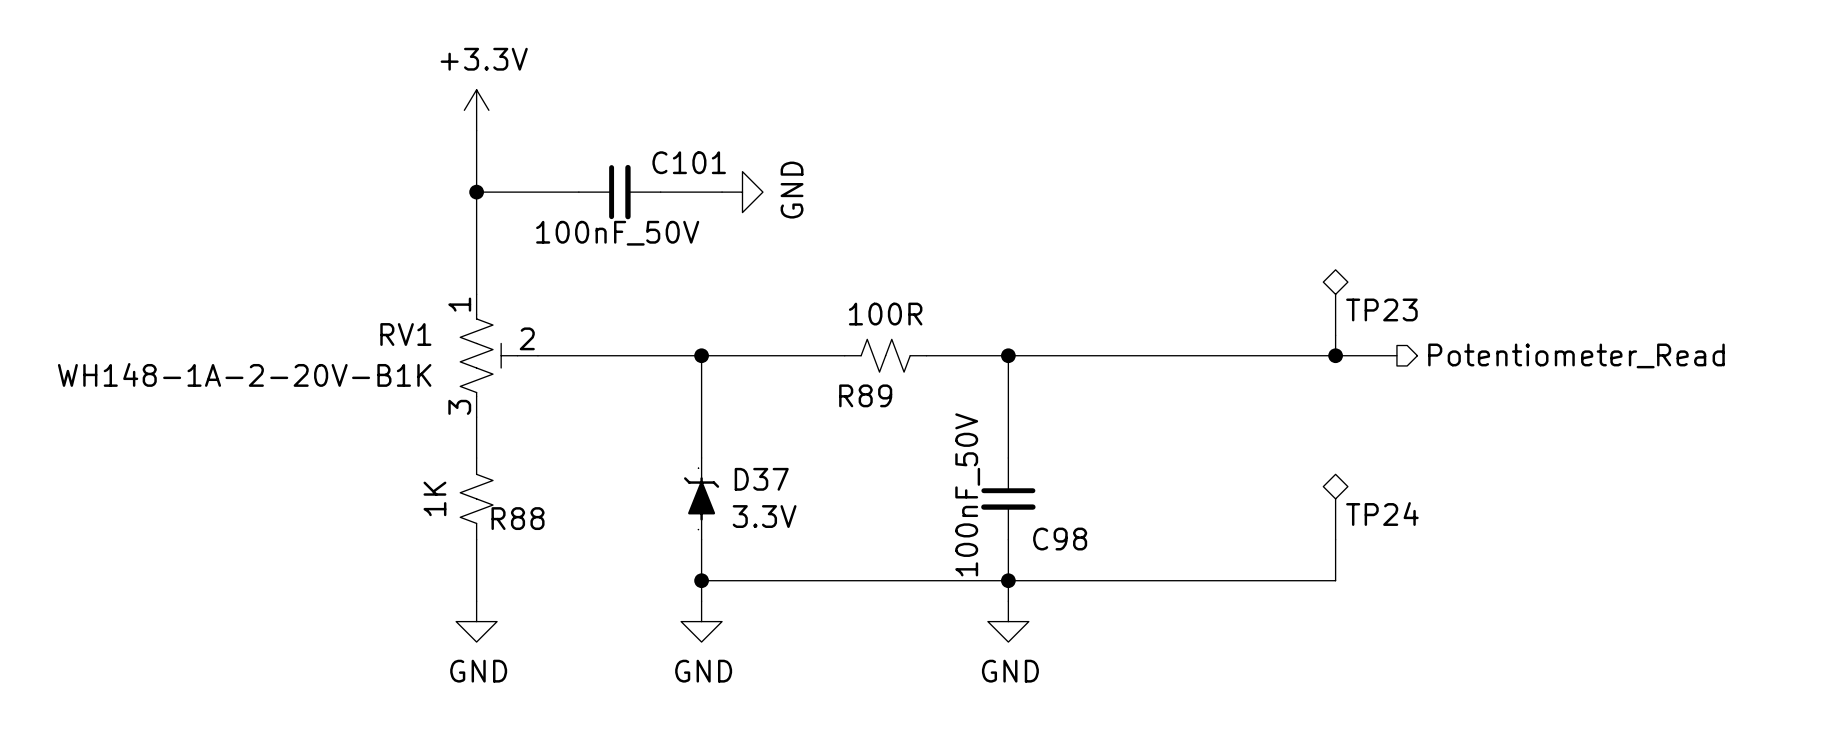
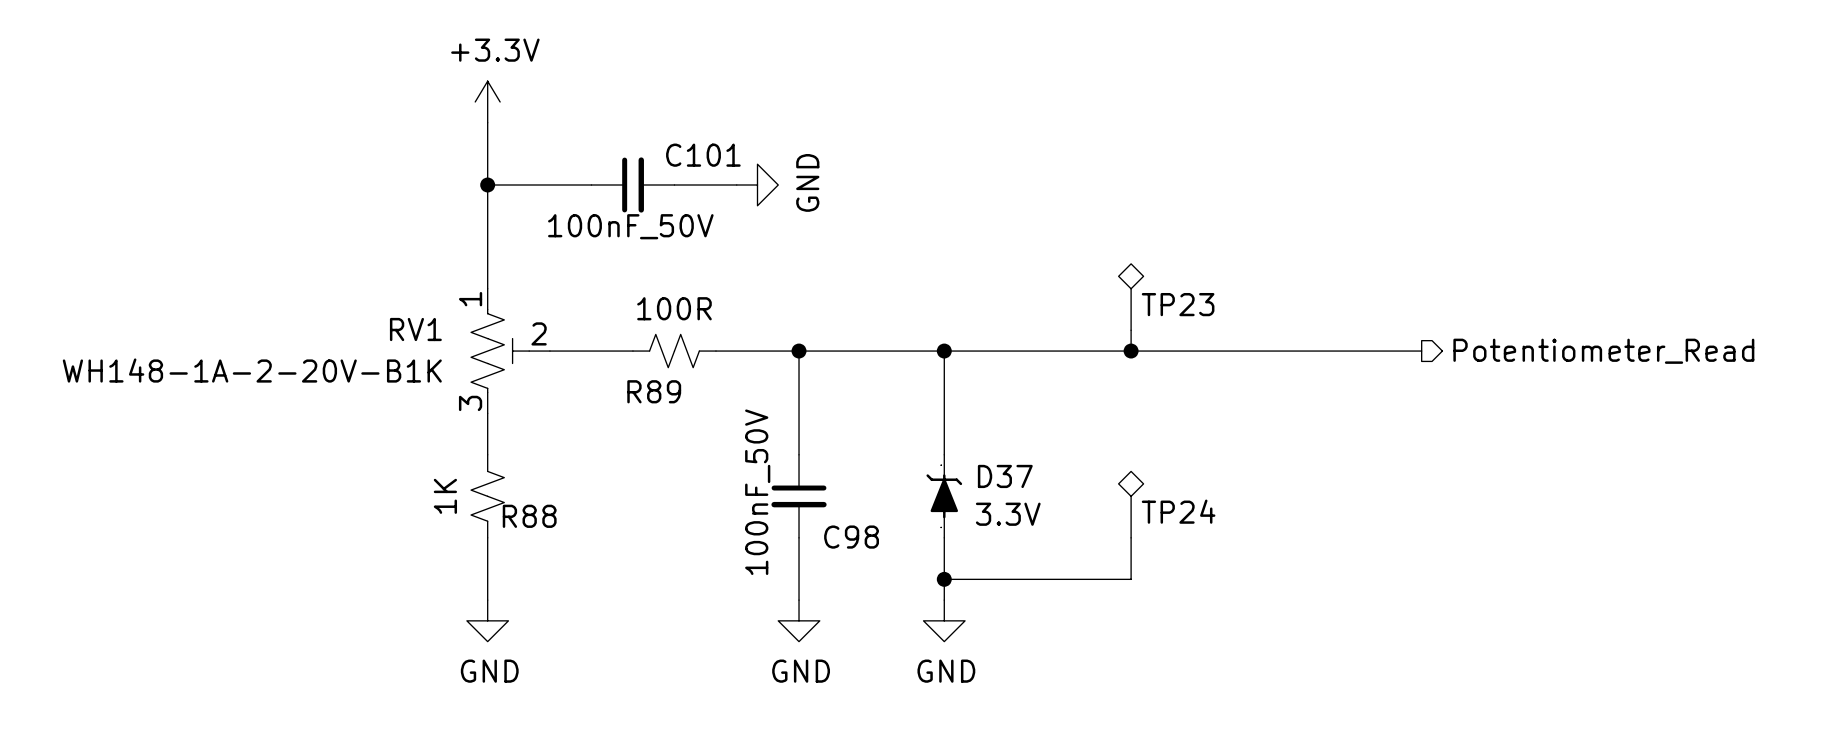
TP23 position: (1335, 302) -> (1131, 297)
wire: (1335, 335) (1335, 355) -> (1131, 330) (1131, 351)
wire: (619, 355) (701, 355) (701, 457) -> (861, 351) (944, 351) (944, 454)
junction position: (701, 355) -> (799, 351)
R89 position: (885, 355) -> (674, 351)
junction: none -> (944, 351)
wire: (1008, 355) (1008, 457) -> (799, 351) (799, 454)
junction: (1008, 355) -> none
junction: none -> (1131, 351)
junction: (1335, 355) -> none
D37 position: (701, 498) -> (944, 496)
C98 position: (1008, 498) -> (799, 496)
TP24 position: (1335, 507) -> (1131, 504)
wire: (701, 539) (701, 601) -> (944, 537) (944, 600)
wire: (1008, 539) (1008, 601) -> (799, 537) (799, 600)
wire: (1335, 539) (1335, 580) (1110, 580) -> (1131, 537) (1131, 579)
wire: (701, 580) (926, 580) -> none
junction: (701, 580) -> none
junction position: (1008, 580) -> (944, 579)
power symbol position: GND (701, 621) -> GND (799, 620)
power symbol position: GND (1008, 621) -> GND (944, 620)

